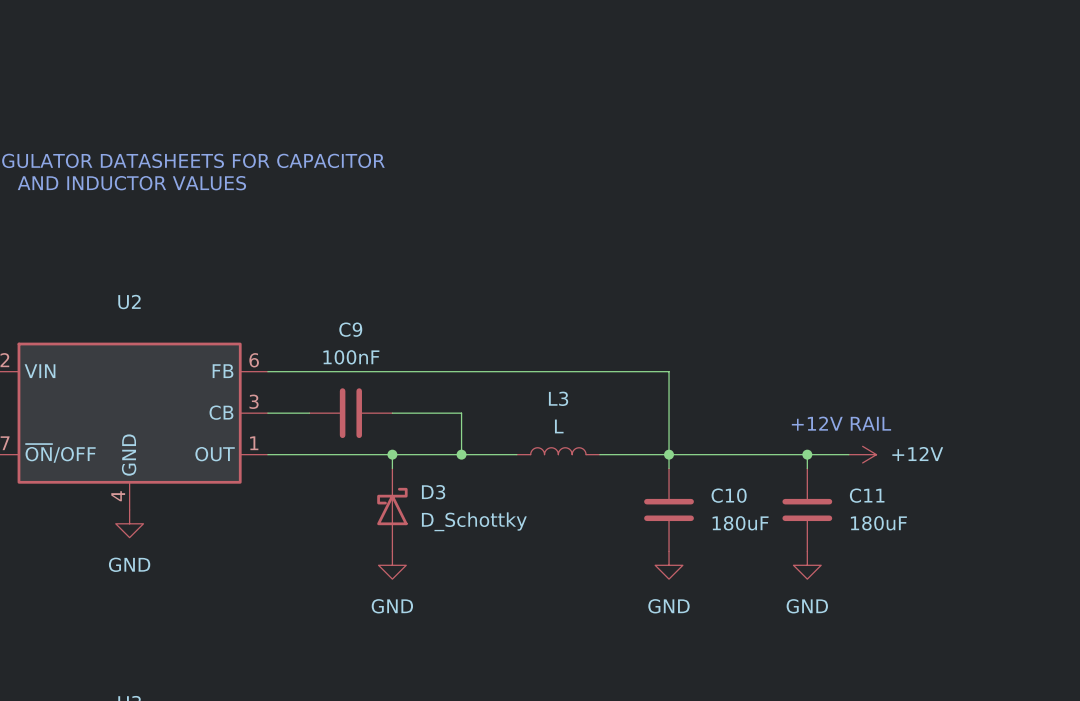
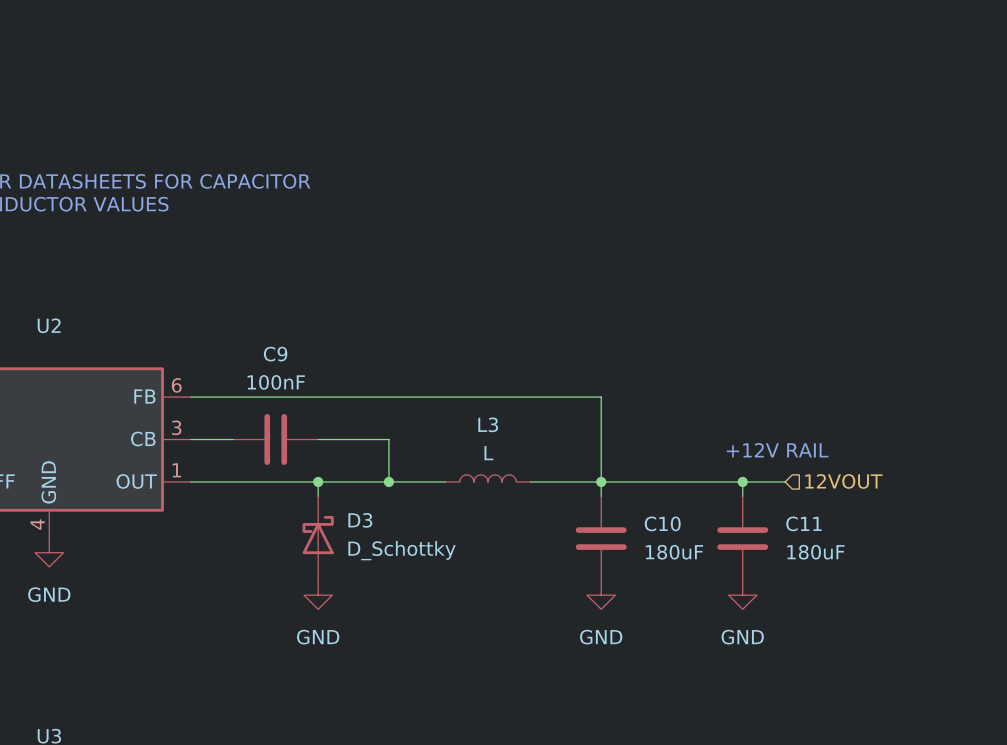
power symbol: +12V (862, 454) -> none
hierarchical label: none -> 12VOUT (843, 481)

